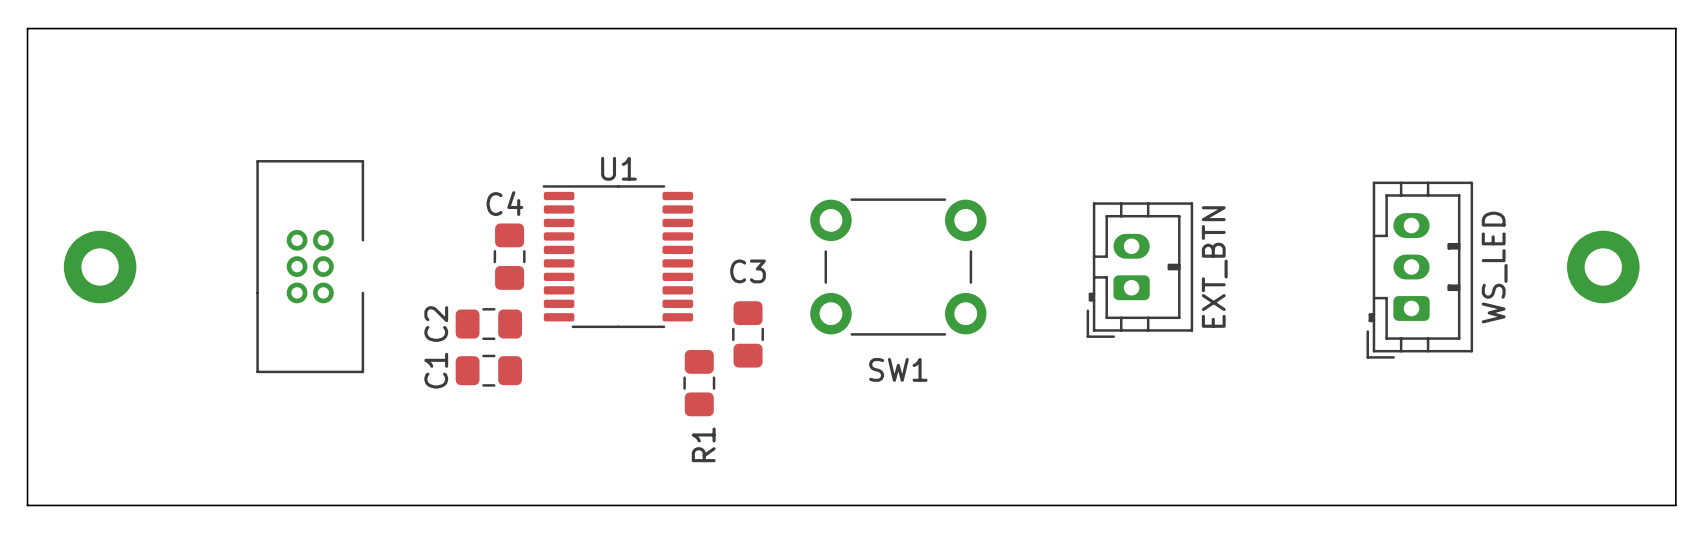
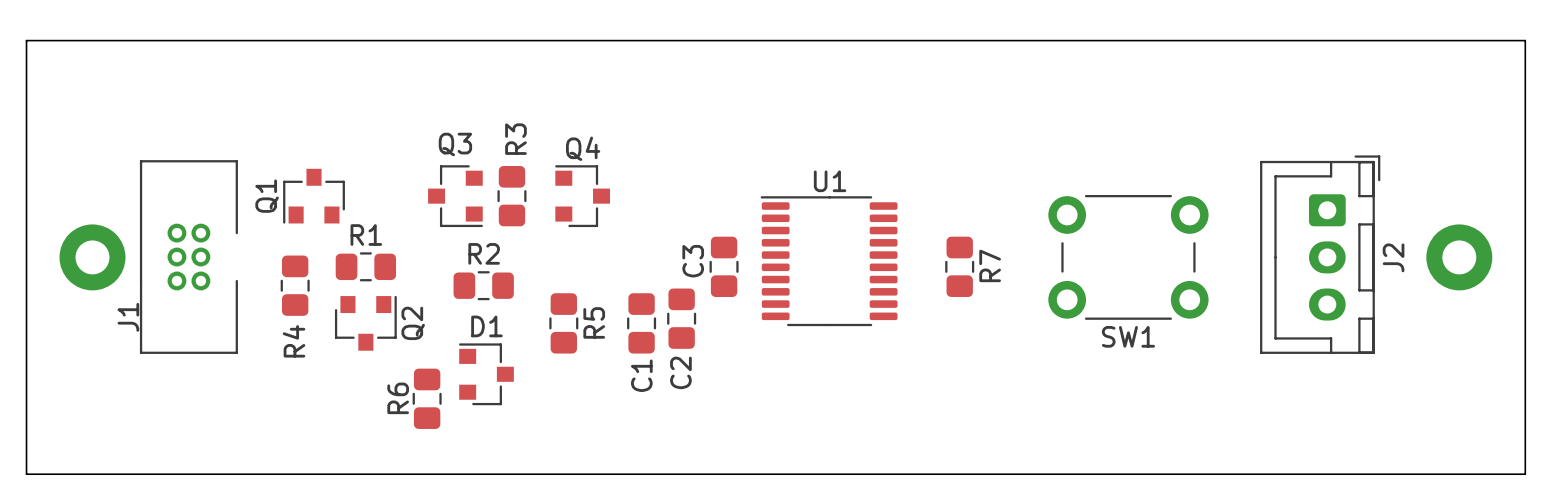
Q1: none -> (314, 196)
Q3: none -> (455, 196)
R3: none -> (511, 196)
Q4: none -> (582, 196)
C4: (509, 256) -> none
U1 position: (617, 256) -> (829, 261)
J2: none -> (1320, 254)
J1: none -> (188, 257)
part: (310, 266) -> none
SW1 position: (898, 267) -> (1128, 257)
part: EXT_BTN (1139, 270) -> none
part: WS_LED (1419, 270) -> none
C3 name: C3 (748, 271) -> C2 (680, 372)
C3: none -> (724, 266)
R7: none -> (959, 266)
R4: none -> (295, 285)
R2: none -> (483, 285)
C2: (488, 324) -> none
Q2: none -> (365, 323)
R5: none -> (563, 323)
SW1 name position: SW1 (898, 369) -> SW1 (1128, 336)
C1 name position: C1 (436, 370) -> C1 (641, 375)
C1 rotation: 0° (488, 370) -> 90° clockwise (641, 323)
C1 position: (488, 370) -> (641, 323)
R1 rotation: 0° (699, 383) -> 90° clockwise (365, 266)
R1 position: (699, 383) -> (365, 266)
D1: none -> (486, 374)
R6: none -> (427, 398)
R1 name position: R1 (703, 444) -> R1 (366, 235)

